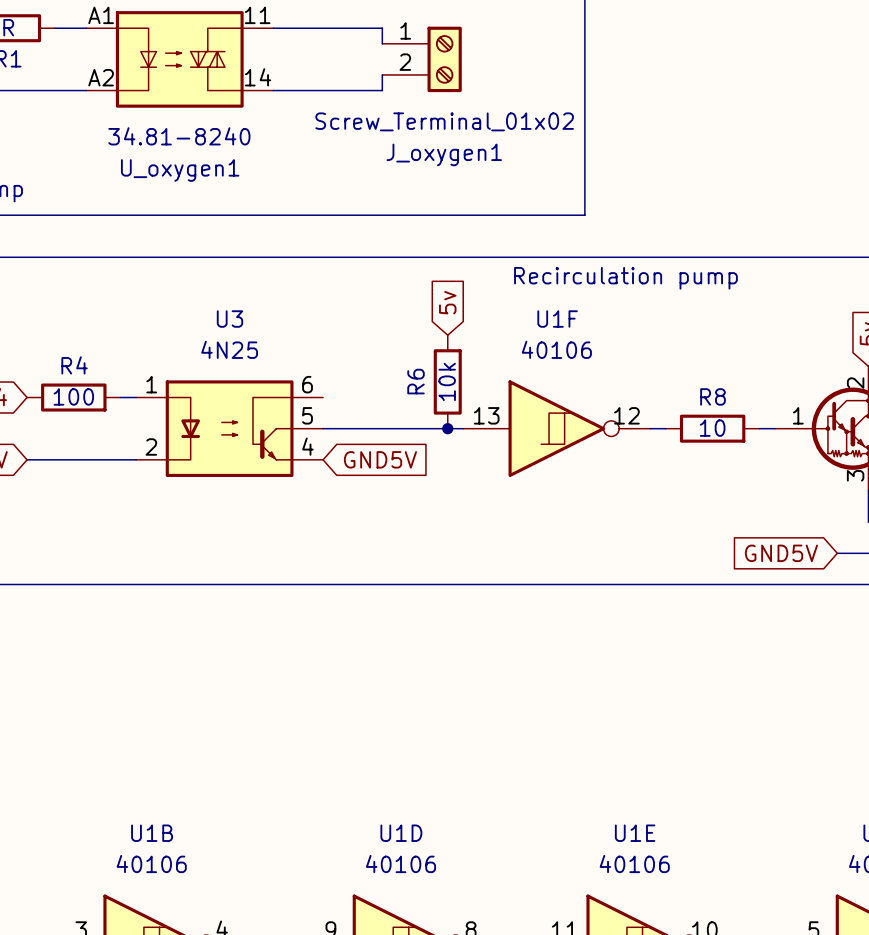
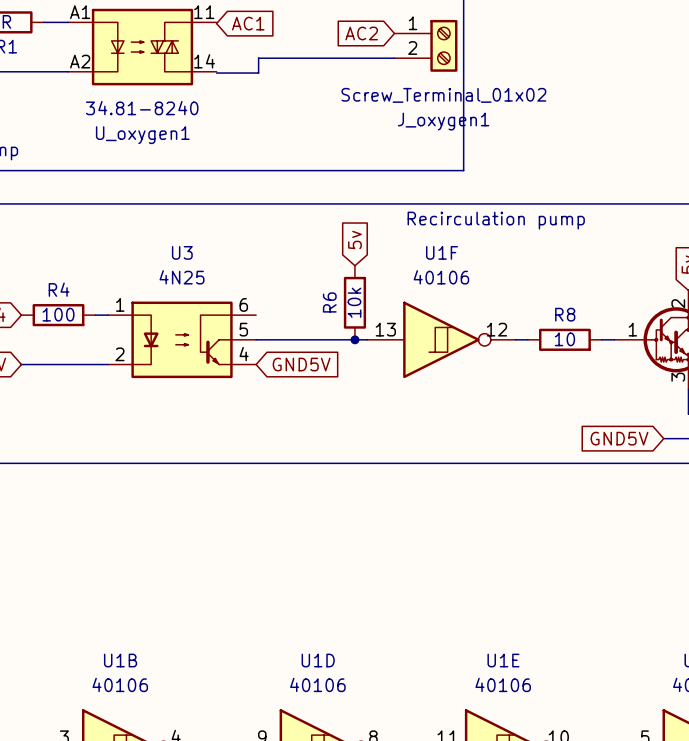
wire: (273, 28) (382, 28) (382, 43) -> none
global label: none -> AC1 (248, 23)
global label: none -> AC2 (361, 33)
J_oxygen1 position: (422, 59) -> (425, 45)
wire: none -> (394, 58) (258, 58) (258, 73) (216, 73)
wire: (382, 74) (382, 90) (273, 90) -> none

